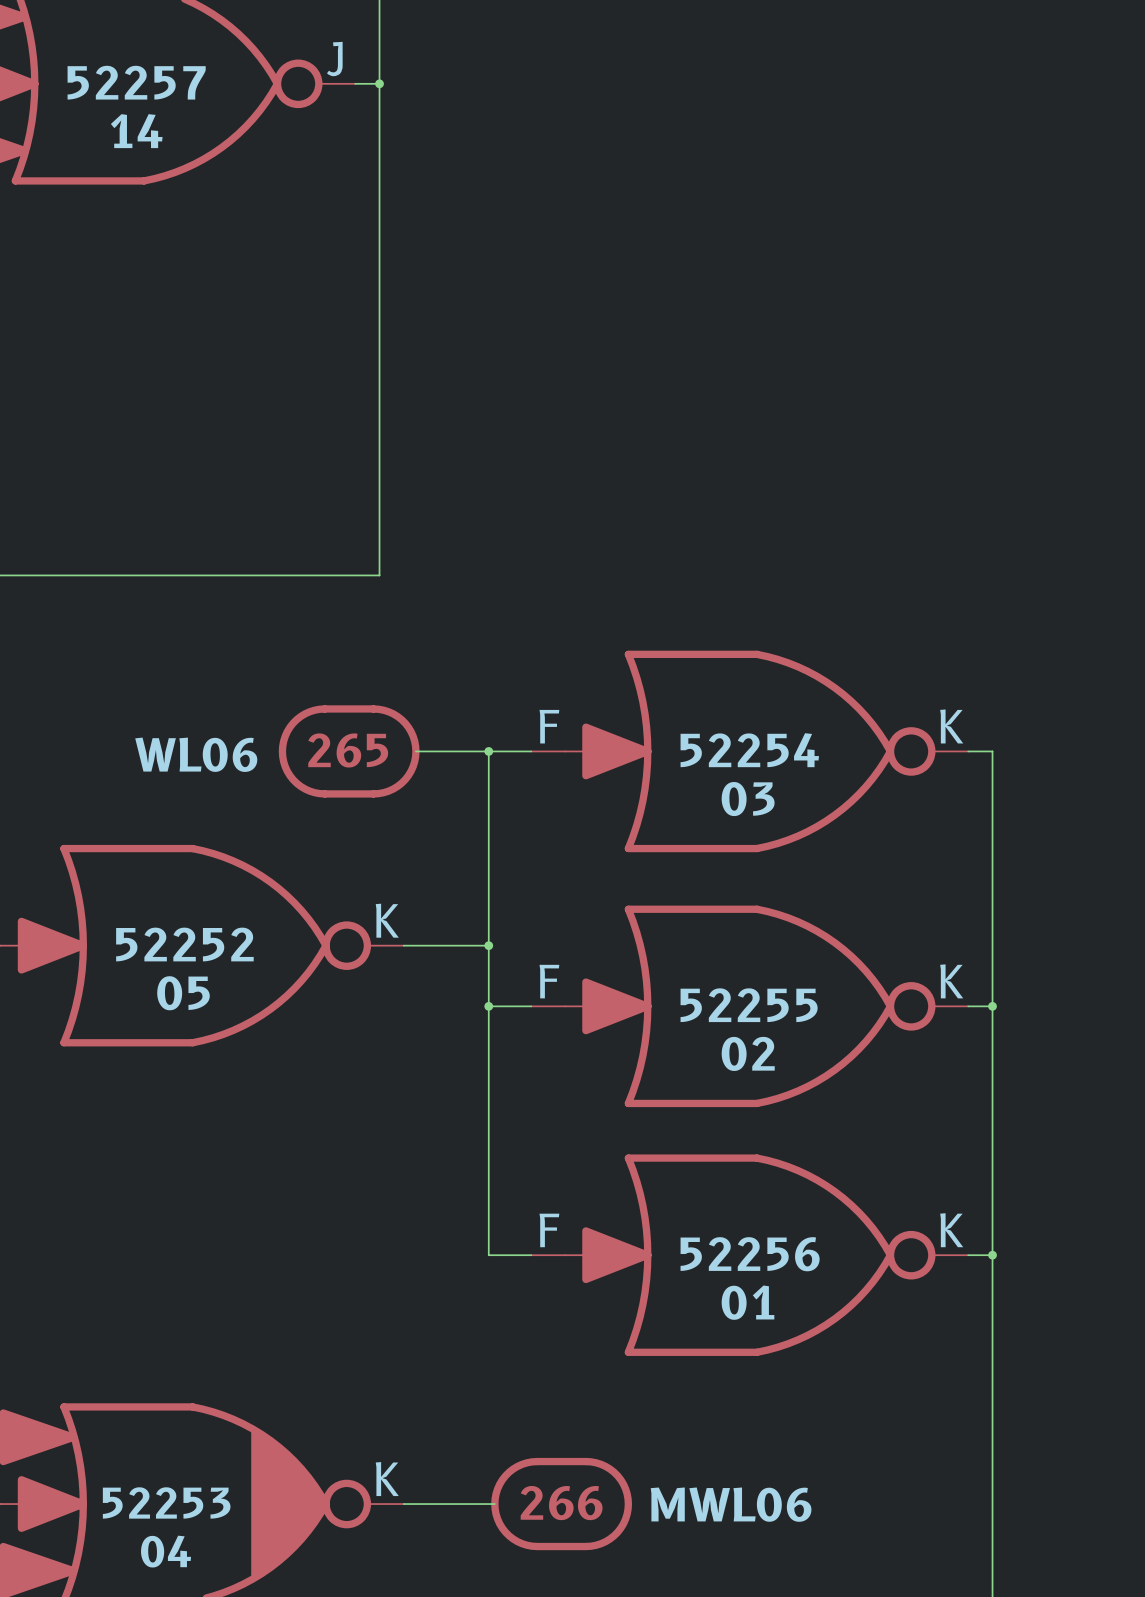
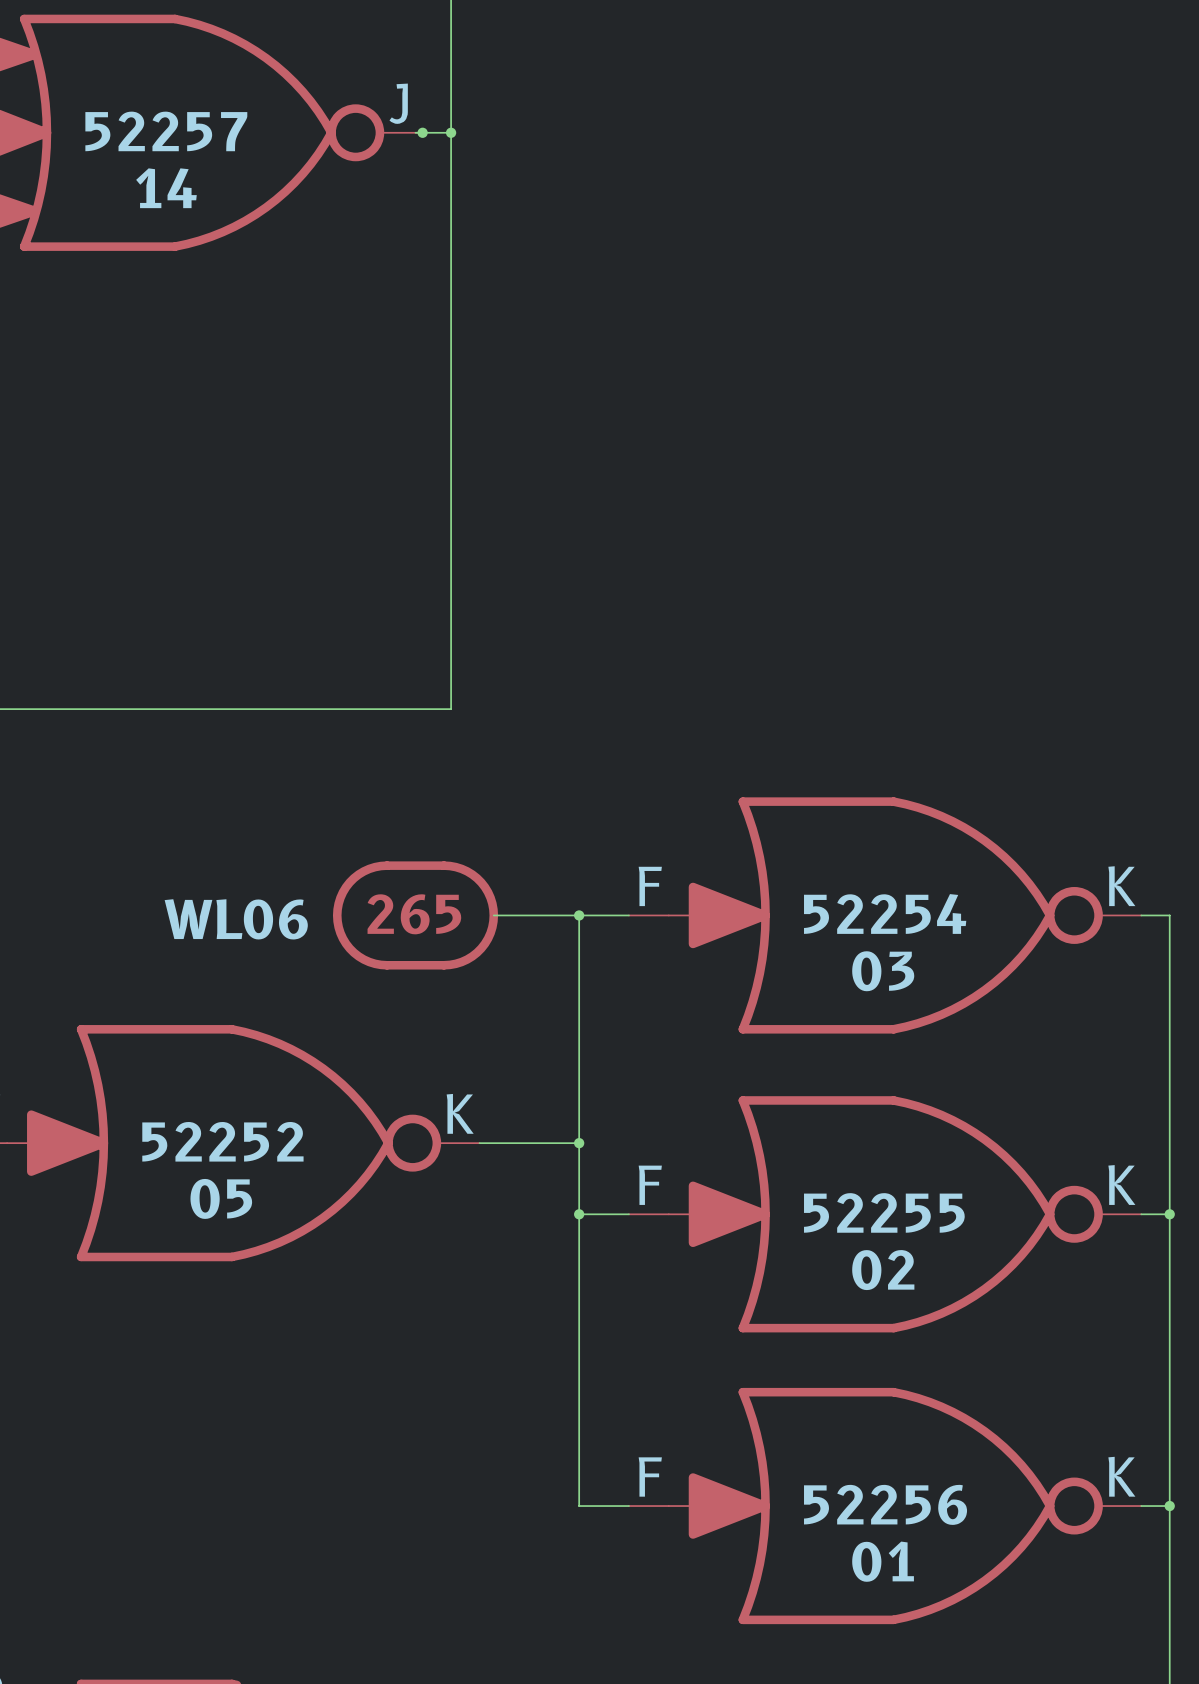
junction: none -> (422, 132)

